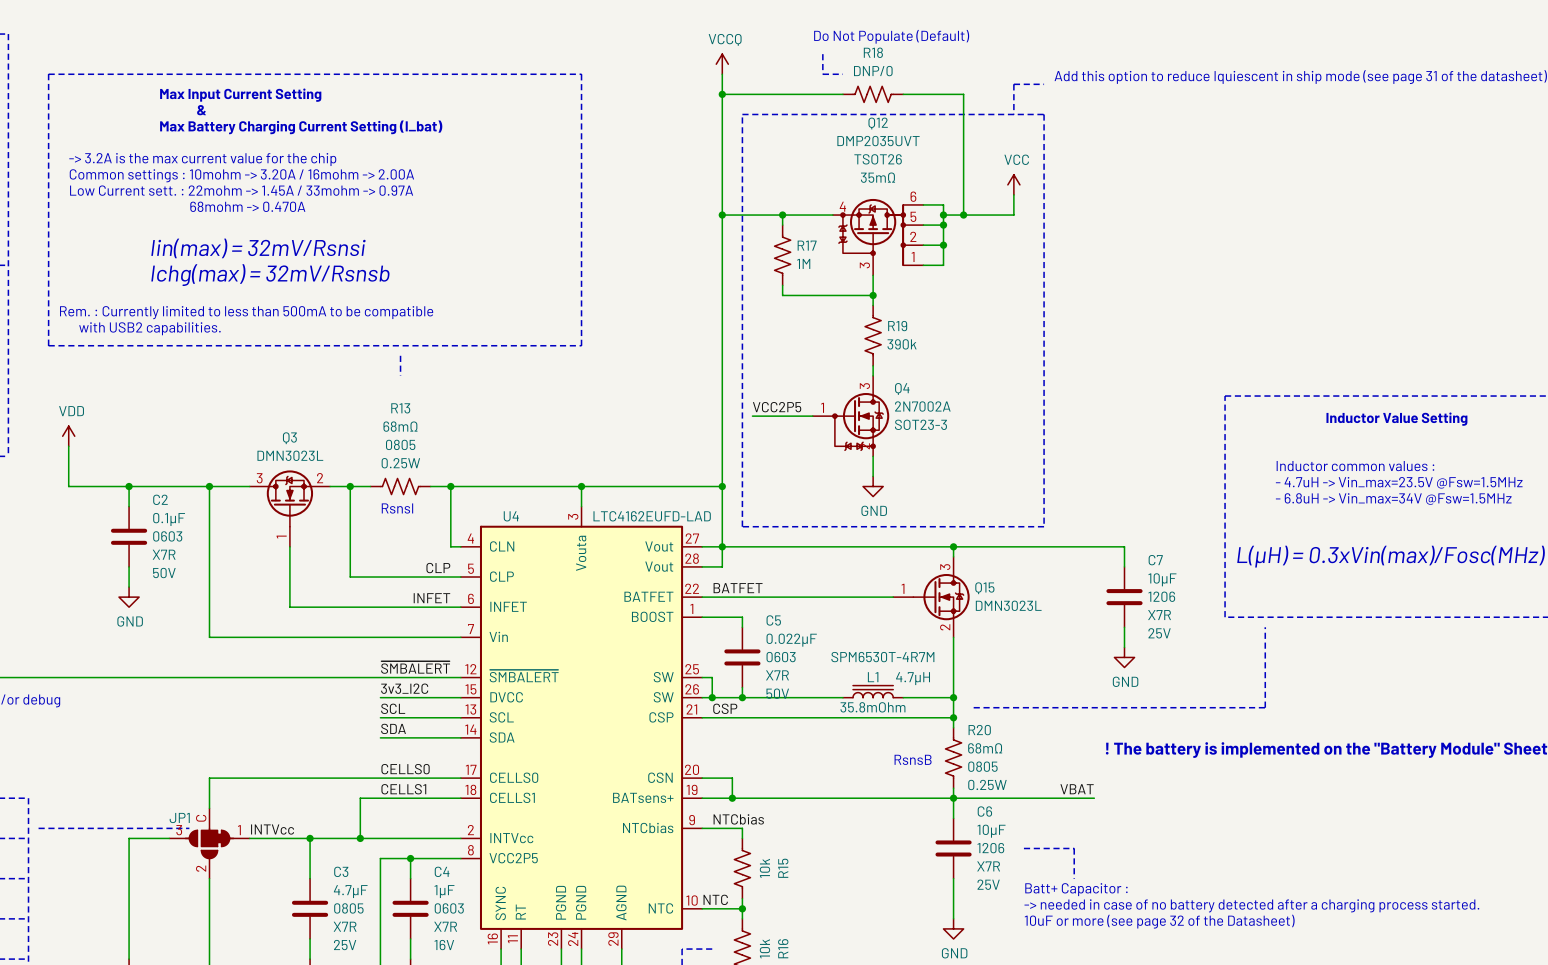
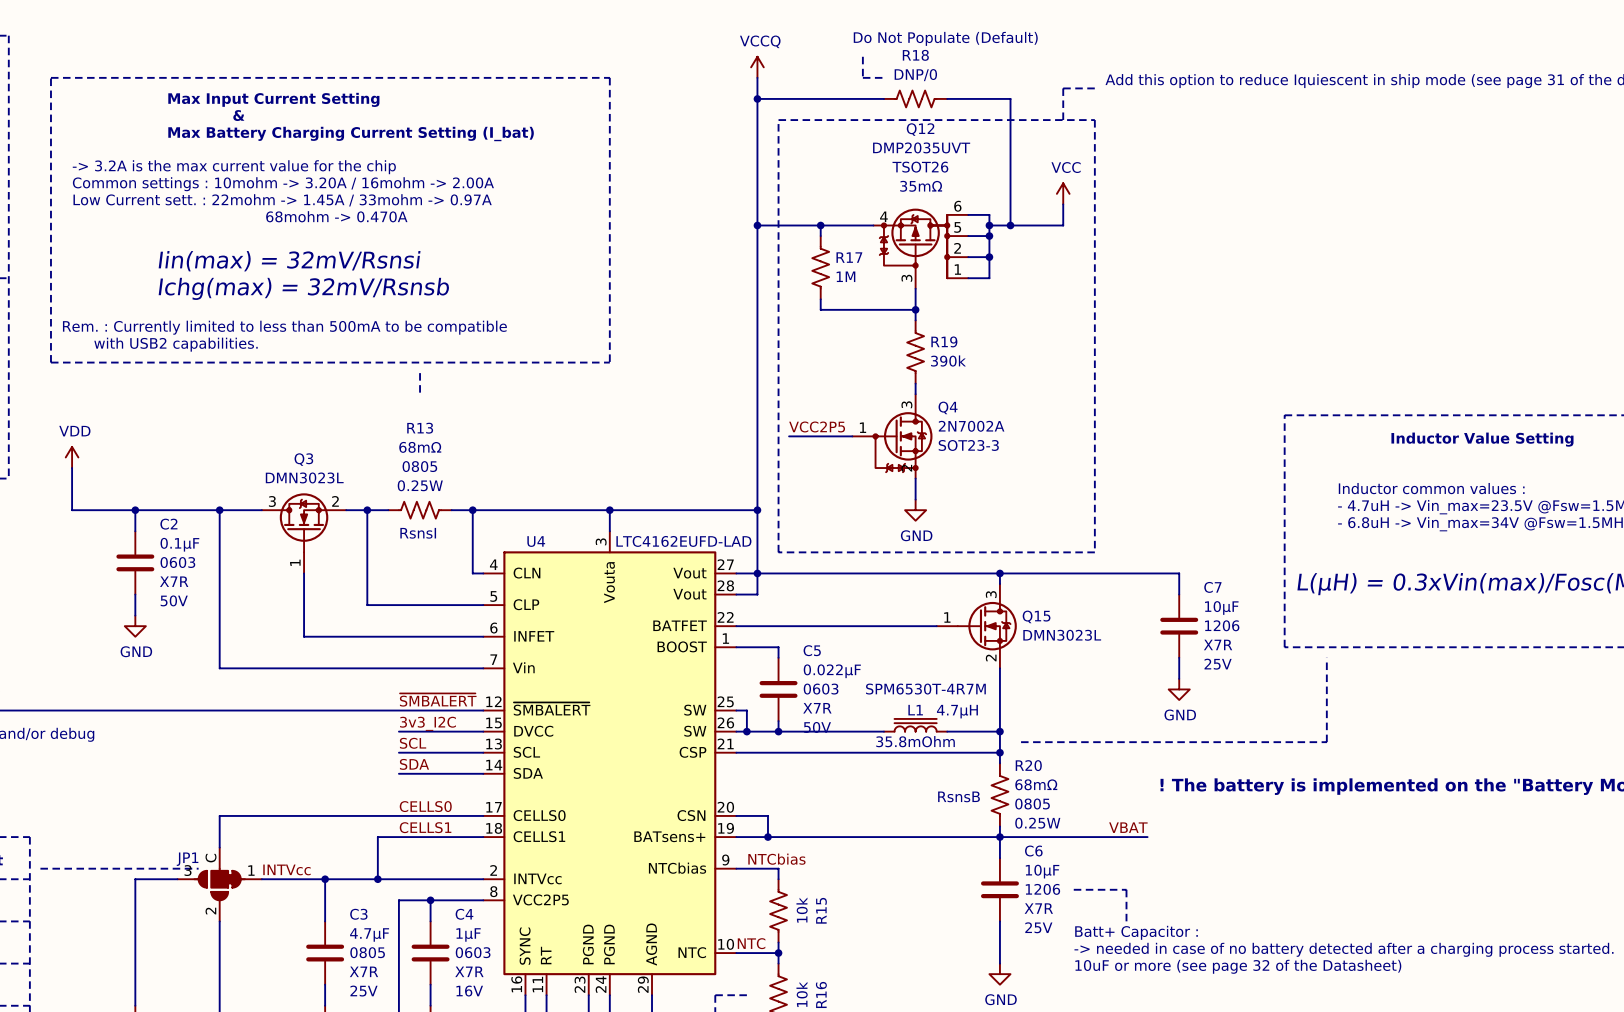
label: CLP (438, 568) -> none
label: BATFET (738, 588) -> none
label: INFET (431, 598) -> none
label: CSP (725, 708) -> none

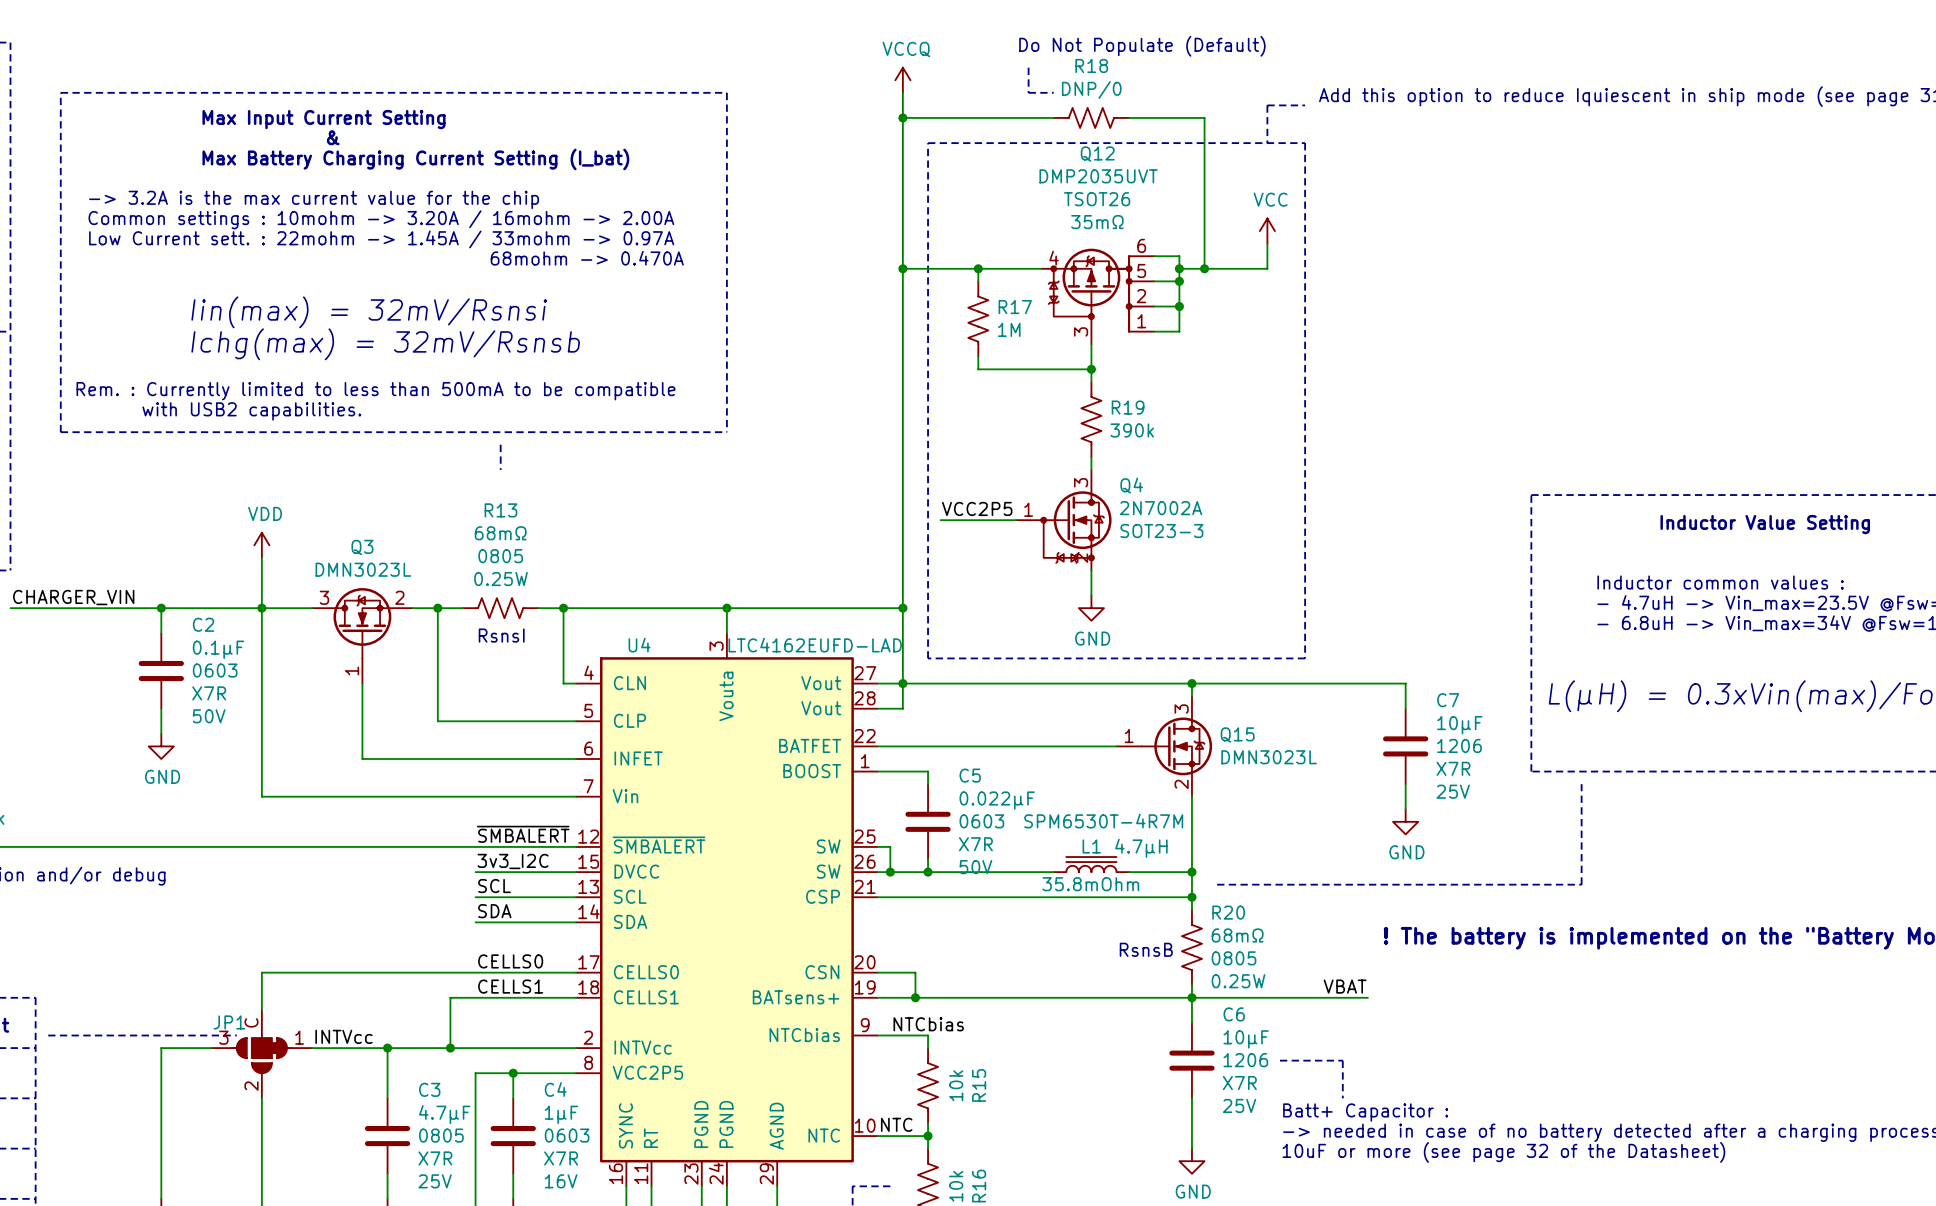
power symbol position: VDD (72, 457) -> VDD (261, 545)
wire: (72, 468) (72, 510) -> (10, 608) (85, 608)
wire: none -> (261, 557) (261, 608)
label: none -> CHARGER_VIN (73, 597)

